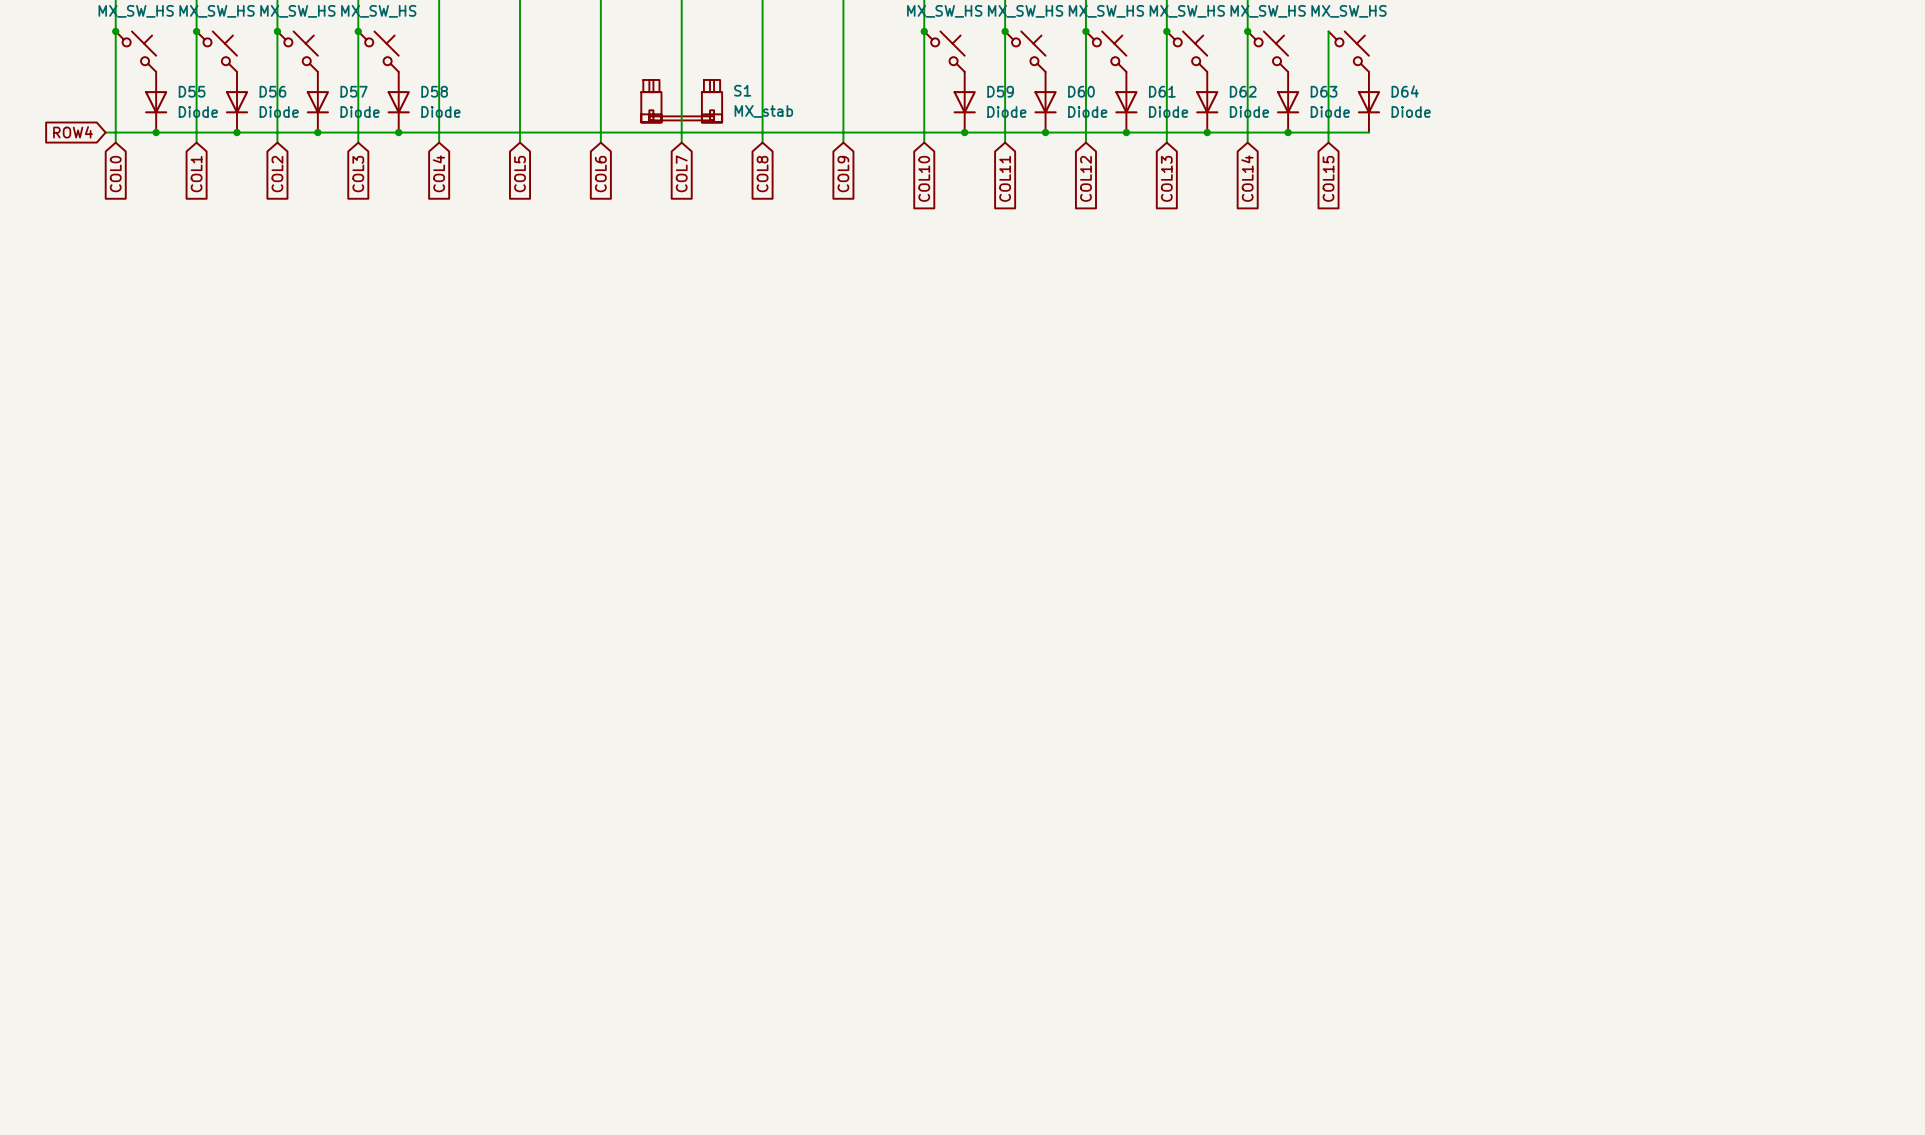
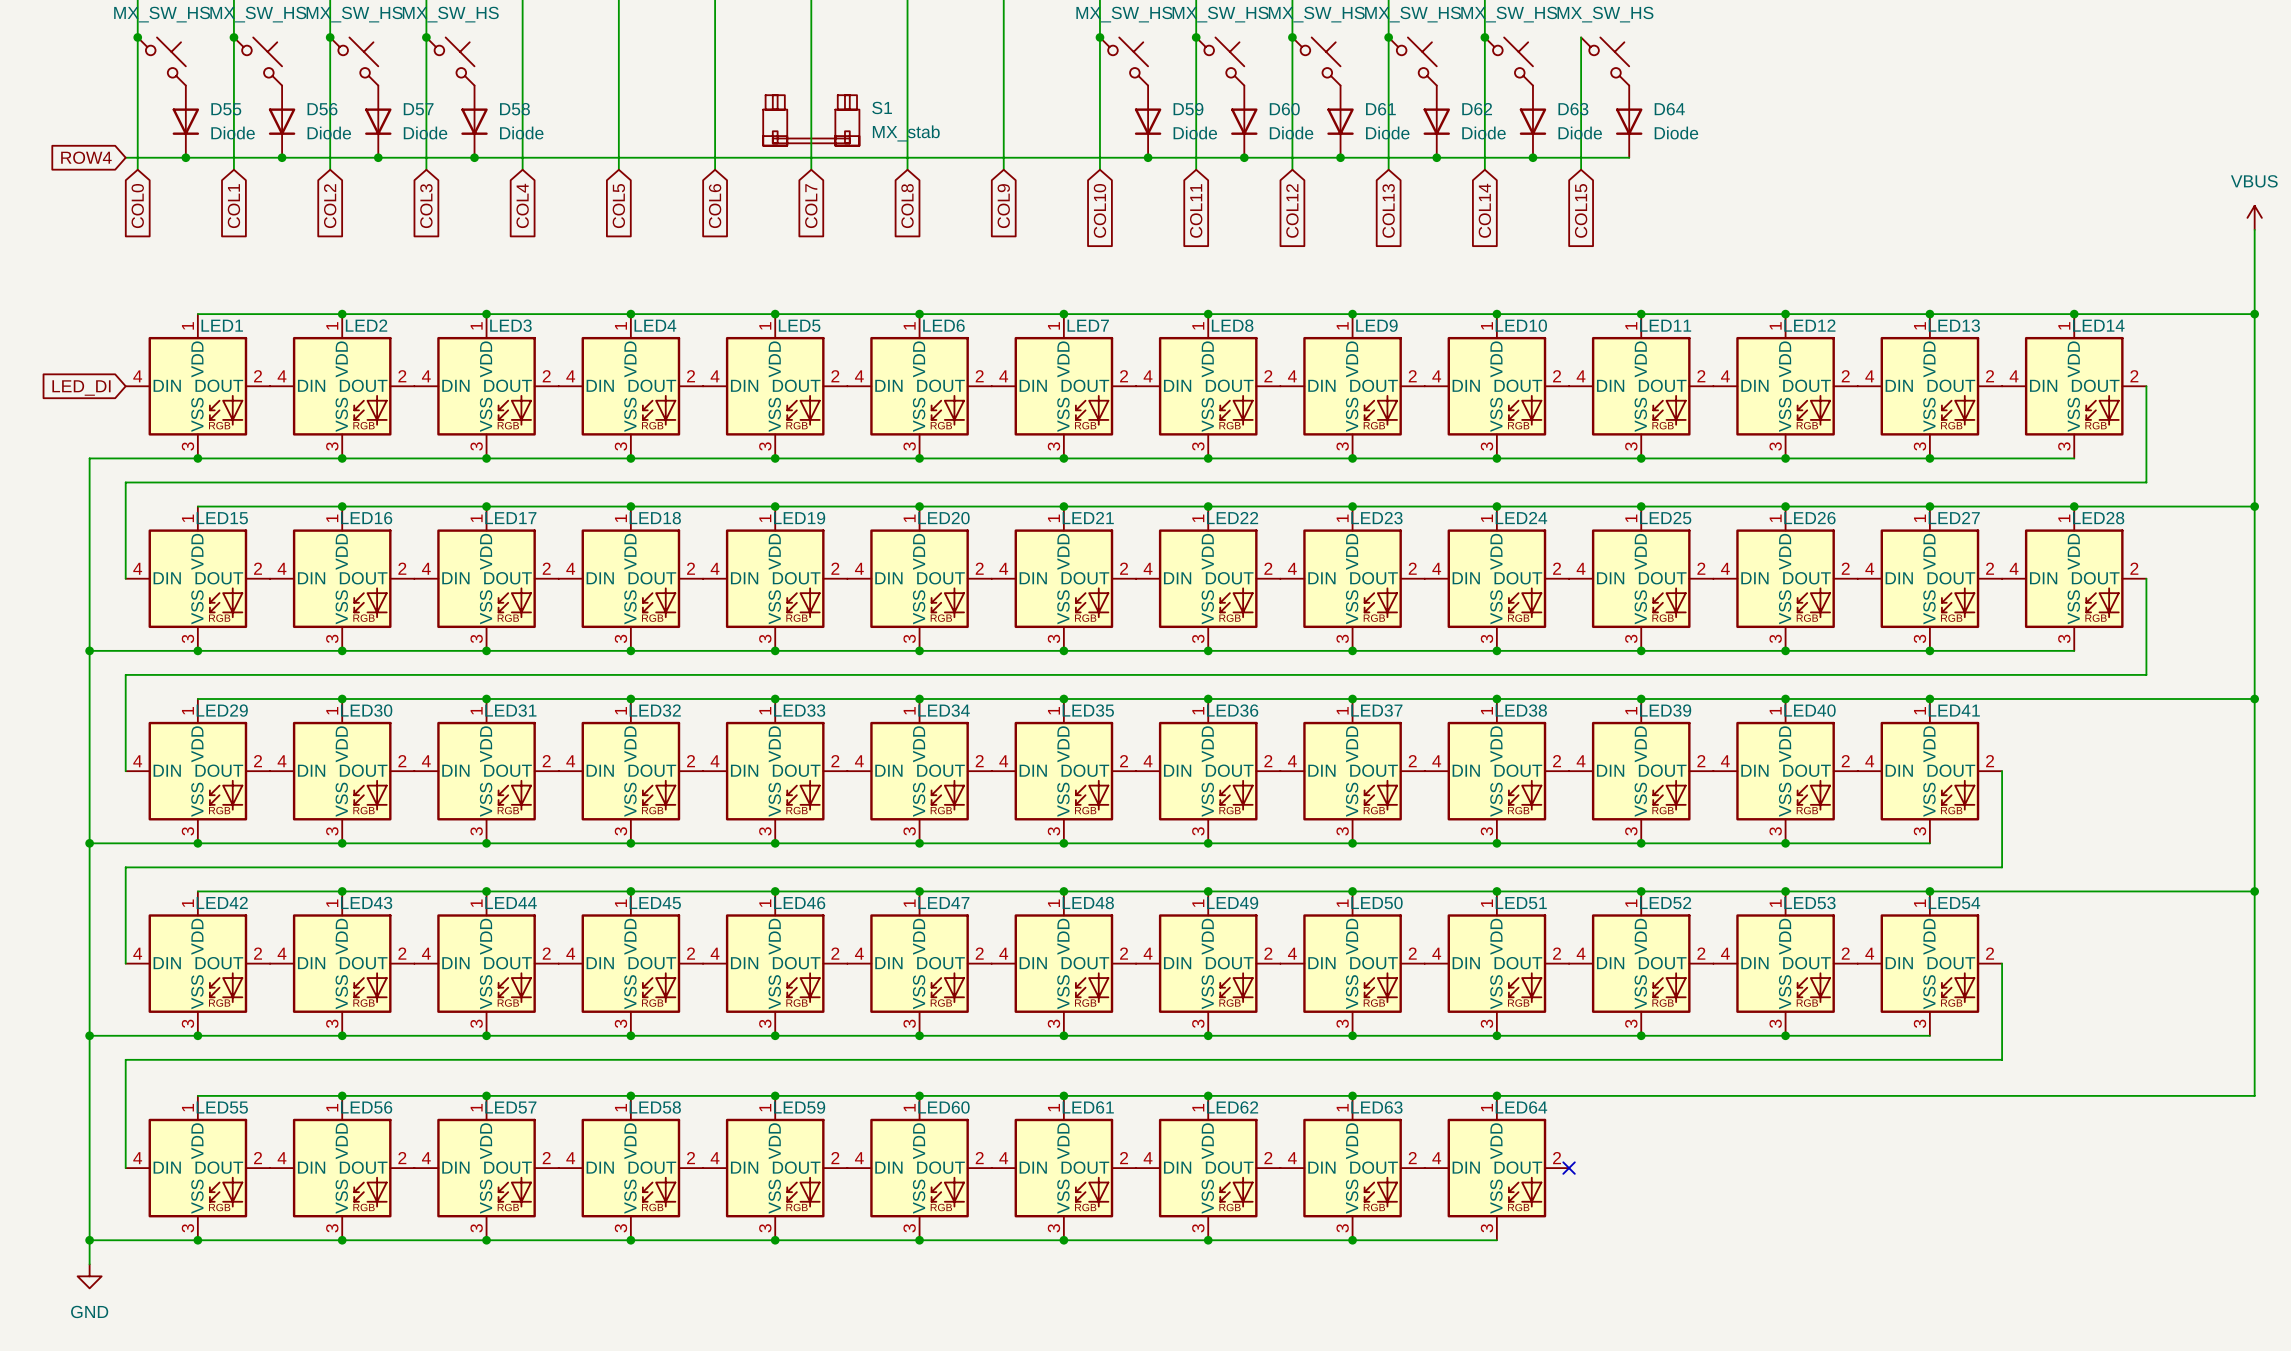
power symbol: none -> VBUS (2254, 217)
wire: none -> (2254, 229) (2254, 1095) (197, 1095)
wire: none -> (197, 314) (2254, 314)
junction: none -> (342, 314)
junction: none -> (486, 314)
junction: none -> (630, 314)
junction: none -> (775, 314)
junction: none -> (919, 314)
junction: none -> (1063, 314)
junction: none -> (1208, 314)
junction: none -> (1352, 314)
junction: none -> (1496, 314)
junction: none -> (1641, 314)
junction: none -> (1785, 314)
junction: none -> (1929, 314)
junction: none -> (2074, 314)
junction: none -> (2254, 314)
LED1: none -> (197, 386)
LED2: none -> (342, 386)
LED3: none -> (486, 386)
LED4: none -> (630, 386)
LED5: none -> (775, 386)
LED6: none -> (919, 386)
LED7: none -> (1063, 386)
LED8: none -> (1208, 386)
LED9: none -> (1352, 386)
LED10: none -> (1496, 386)
LED11: none -> (1641, 386)
LED12: none -> (1785, 386)
LED13: none -> (1929, 386)
LED14: none -> (2074, 386)
wire: none -> (2146, 386) (2146, 482) (125, 482) (125, 578)
global label: none -> LED_DI (81, 388)
junction: none -> (197, 458)
junction: none -> (342, 458)
junction: none -> (486, 458)
junction: none -> (630, 458)
junction: none -> (775, 458)
junction: none -> (919, 458)
junction: none -> (1063, 458)
junction: none -> (1208, 458)
junction: none -> (1352, 458)
junction: none -> (1496, 458)
junction: none -> (1641, 458)
junction: none -> (1785, 458)
junction: none -> (1929, 458)
wire: none -> (2074, 458) (89, 458) (89, 1264)
wire: none -> (197, 506) (2254, 506)
junction: none -> (342, 506)
junction: none -> (486, 506)
junction: none -> (630, 506)
junction: none -> (775, 506)
junction: none -> (919, 506)
junction: none -> (1063, 506)
junction: none -> (1208, 506)
junction: none -> (1352, 506)
junction: none -> (1496, 506)
junction: none -> (1641, 506)
junction: none -> (1785, 506)
junction: none -> (1929, 506)
junction: none -> (2074, 506)
junction: none -> (2254, 506)
LED15: none -> (197, 578)
LED16: none -> (342, 578)
LED17: none -> (486, 578)
LED18: none -> (630, 578)
LED19: none -> (775, 578)
LED20: none -> (919, 578)
LED21: none -> (1063, 578)
LED22: none -> (1208, 578)
LED23: none -> (1352, 578)
LED24: none -> (1496, 578)
LED25: none -> (1641, 578)
LED26: none -> (1785, 578)
LED27: none -> (1929, 578)
LED28: none -> (2074, 578)
wire: none -> (2146, 578) (2146, 674) (125, 674) (125, 771)
wire: none -> (89, 650) (2074, 650)
junction: none -> (89, 650)
junction: none -> (197, 650)
junction: none -> (342, 650)
junction: none -> (486, 650)
junction: none -> (630, 650)
junction: none -> (775, 650)
junction: none -> (919, 650)
junction: none -> (1063, 650)
junction: none -> (1208, 650)
junction: none -> (1352, 650)
junction: none -> (1496, 650)
junction: none -> (1641, 650)
junction: none -> (1785, 650)
junction: none -> (1929, 650)
wire: none -> (197, 699) (2254, 699)
junction: none -> (342, 699)
junction: none -> (486, 699)
junction: none -> (630, 699)
junction: none -> (775, 699)
junction: none -> (919, 699)
junction: none -> (1063, 699)
junction: none -> (1208, 699)
junction: none -> (1352, 699)
junction: none -> (1496, 699)
junction: none -> (1641, 699)
junction: none -> (1785, 699)
junction: none -> (1929, 699)
junction: none -> (2254, 699)
LED29: none -> (197, 771)
LED30: none -> (342, 771)
LED31: none -> (486, 771)
LED32: none -> (630, 771)
LED33: none -> (775, 771)
LED34: none -> (919, 771)
LED35: none -> (1063, 771)
LED36: none -> (1208, 771)
LED37: none -> (1352, 771)
LED38: none -> (1496, 771)
LED39: none -> (1641, 771)
LED40: none -> (1785, 771)
LED41: none -> (1929, 771)
wire: none -> (2002, 771) (2002, 867) (125, 867) (125, 963)
wire: none -> (89, 843) (1929, 843)
junction: none -> (89, 843)
junction: none -> (197, 843)
junction: none -> (342, 843)
junction: none -> (486, 843)
junction: none -> (630, 843)
junction: none -> (775, 843)
junction: none -> (919, 843)
junction: none -> (1063, 843)
junction: none -> (1208, 843)
junction: none -> (1352, 843)
junction: none -> (1496, 843)
junction: none -> (1641, 843)
junction: none -> (1785, 843)
wire: none -> (197, 891) (2254, 891)
junction: none -> (342, 891)
junction: none -> (486, 891)
junction: none -> (630, 891)
junction: none -> (775, 891)
junction: none -> (919, 891)
junction: none -> (1063, 891)
junction: none -> (1208, 891)
junction: none -> (1352, 891)
junction: none -> (1496, 891)
junction: none -> (1641, 891)
junction: none -> (1785, 891)
junction: none -> (1929, 891)
junction: none -> (2254, 891)
LED42: none -> (197, 963)
LED43: none -> (342, 963)
LED44: none -> (486, 963)
LED45: none -> (630, 963)
LED46: none -> (775, 963)
LED47: none -> (919, 963)
LED48: none -> (1063, 963)
LED49: none -> (1208, 963)
LED50: none -> (1352, 963)
LED51: none -> (1496, 963)
LED52: none -> (1641, 963)
LED53: none -> (1785, 963)
LED54: none -> (1929, 963)
wire: none -> (2002, 963) (2002, 1059) (125, 1059) (125, 1168)
wire: none -> (89, 1035) (1929, 1035)
junction: none -> (89, 1035)
junction: none -> (197, 1035)
junction: none -> (342, 1035)
junction: none -> (486, 1035)
junction: none -> (630, 1035)
junction: none -> (775, 1035)
junction: none -> (919, 1035)
junction: none -> (1063, 1035)
junction: none -> (1208, 1035)
junction: none -> (1352, 1035)
junction: none -> (1496, 1035)
junction: none -> (1641, 1035)
junction: none -> (1785, 1035)
junction: none -> (342, 1095)
junction: none -> (486, 1095)
junction: none -> (630, 1095)
junction: none -> (775, 1095)
junction: none -> (919, 1095)
junction: none -> (1063, 1095)
junction: none -> (1208, 1095)
junction: none -> (1352, 1095)
junction: none -> (1496, 1095)
LED55: none -> (197, 1168)
LED56: none -> (342, 1168)
LED57: none -> (486, 1168)
LED58: none -> (630, 1168)
LED59: none -> (775, 1168)
LED60: none -> (919, 1168)
LED61: none -> (1063, 1168)
LED62: none -> (1208, 1168)
LED63: none -> (1352, 1168)
LED64: none -> (1496, 1168)
no-connect mark: none -> (1569, 1168)
wire: none -> (89, 1240) (1496, 1240)
junction: none -> (89, 1240)
junction: none -> (197, 1240)
junction: none -> (342, 1240)
junction: none -> (486, 1240)
junction: none -> (630, 1240)
junction: none -> (775, 1240)
junction: none -> (919, 1240)
junction: none -> (1063, 1240)
junction: none -> (1208, 1240)
junction: none -> (1352, 1240)
power symbol: none -> GND (89, 1276)

